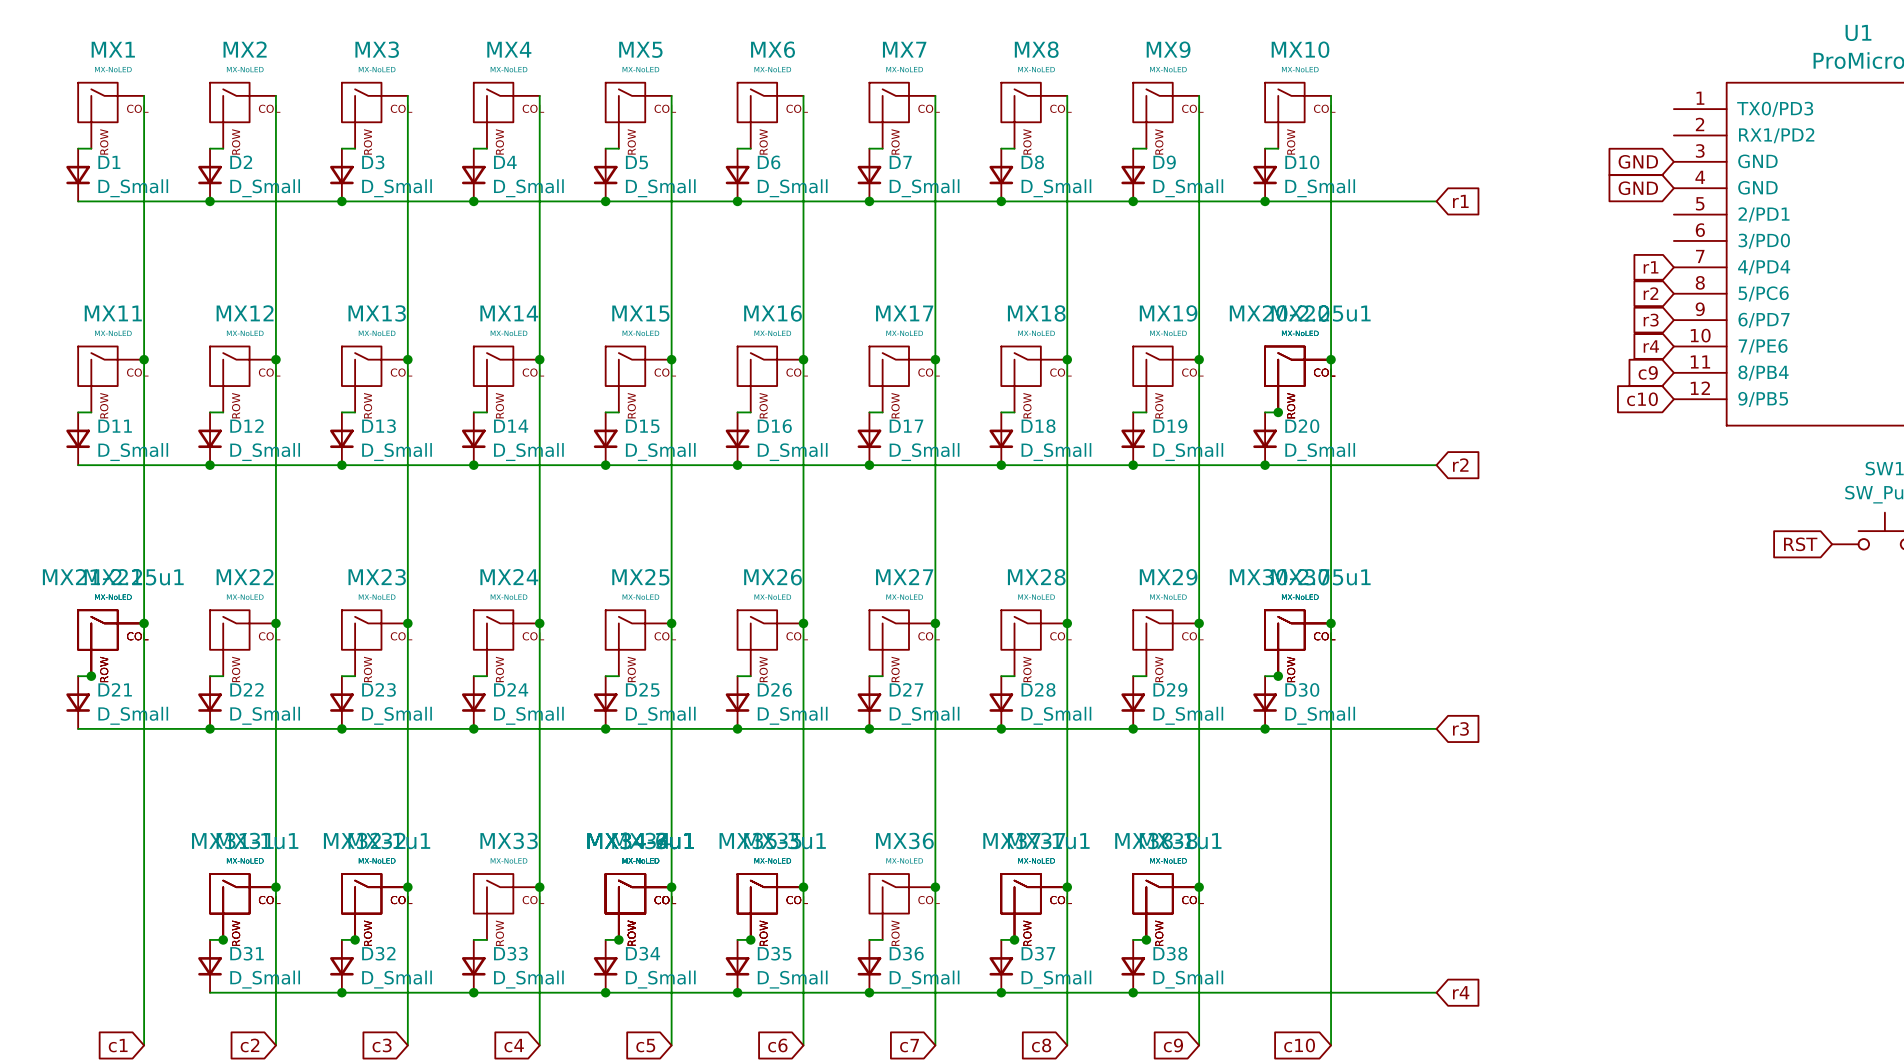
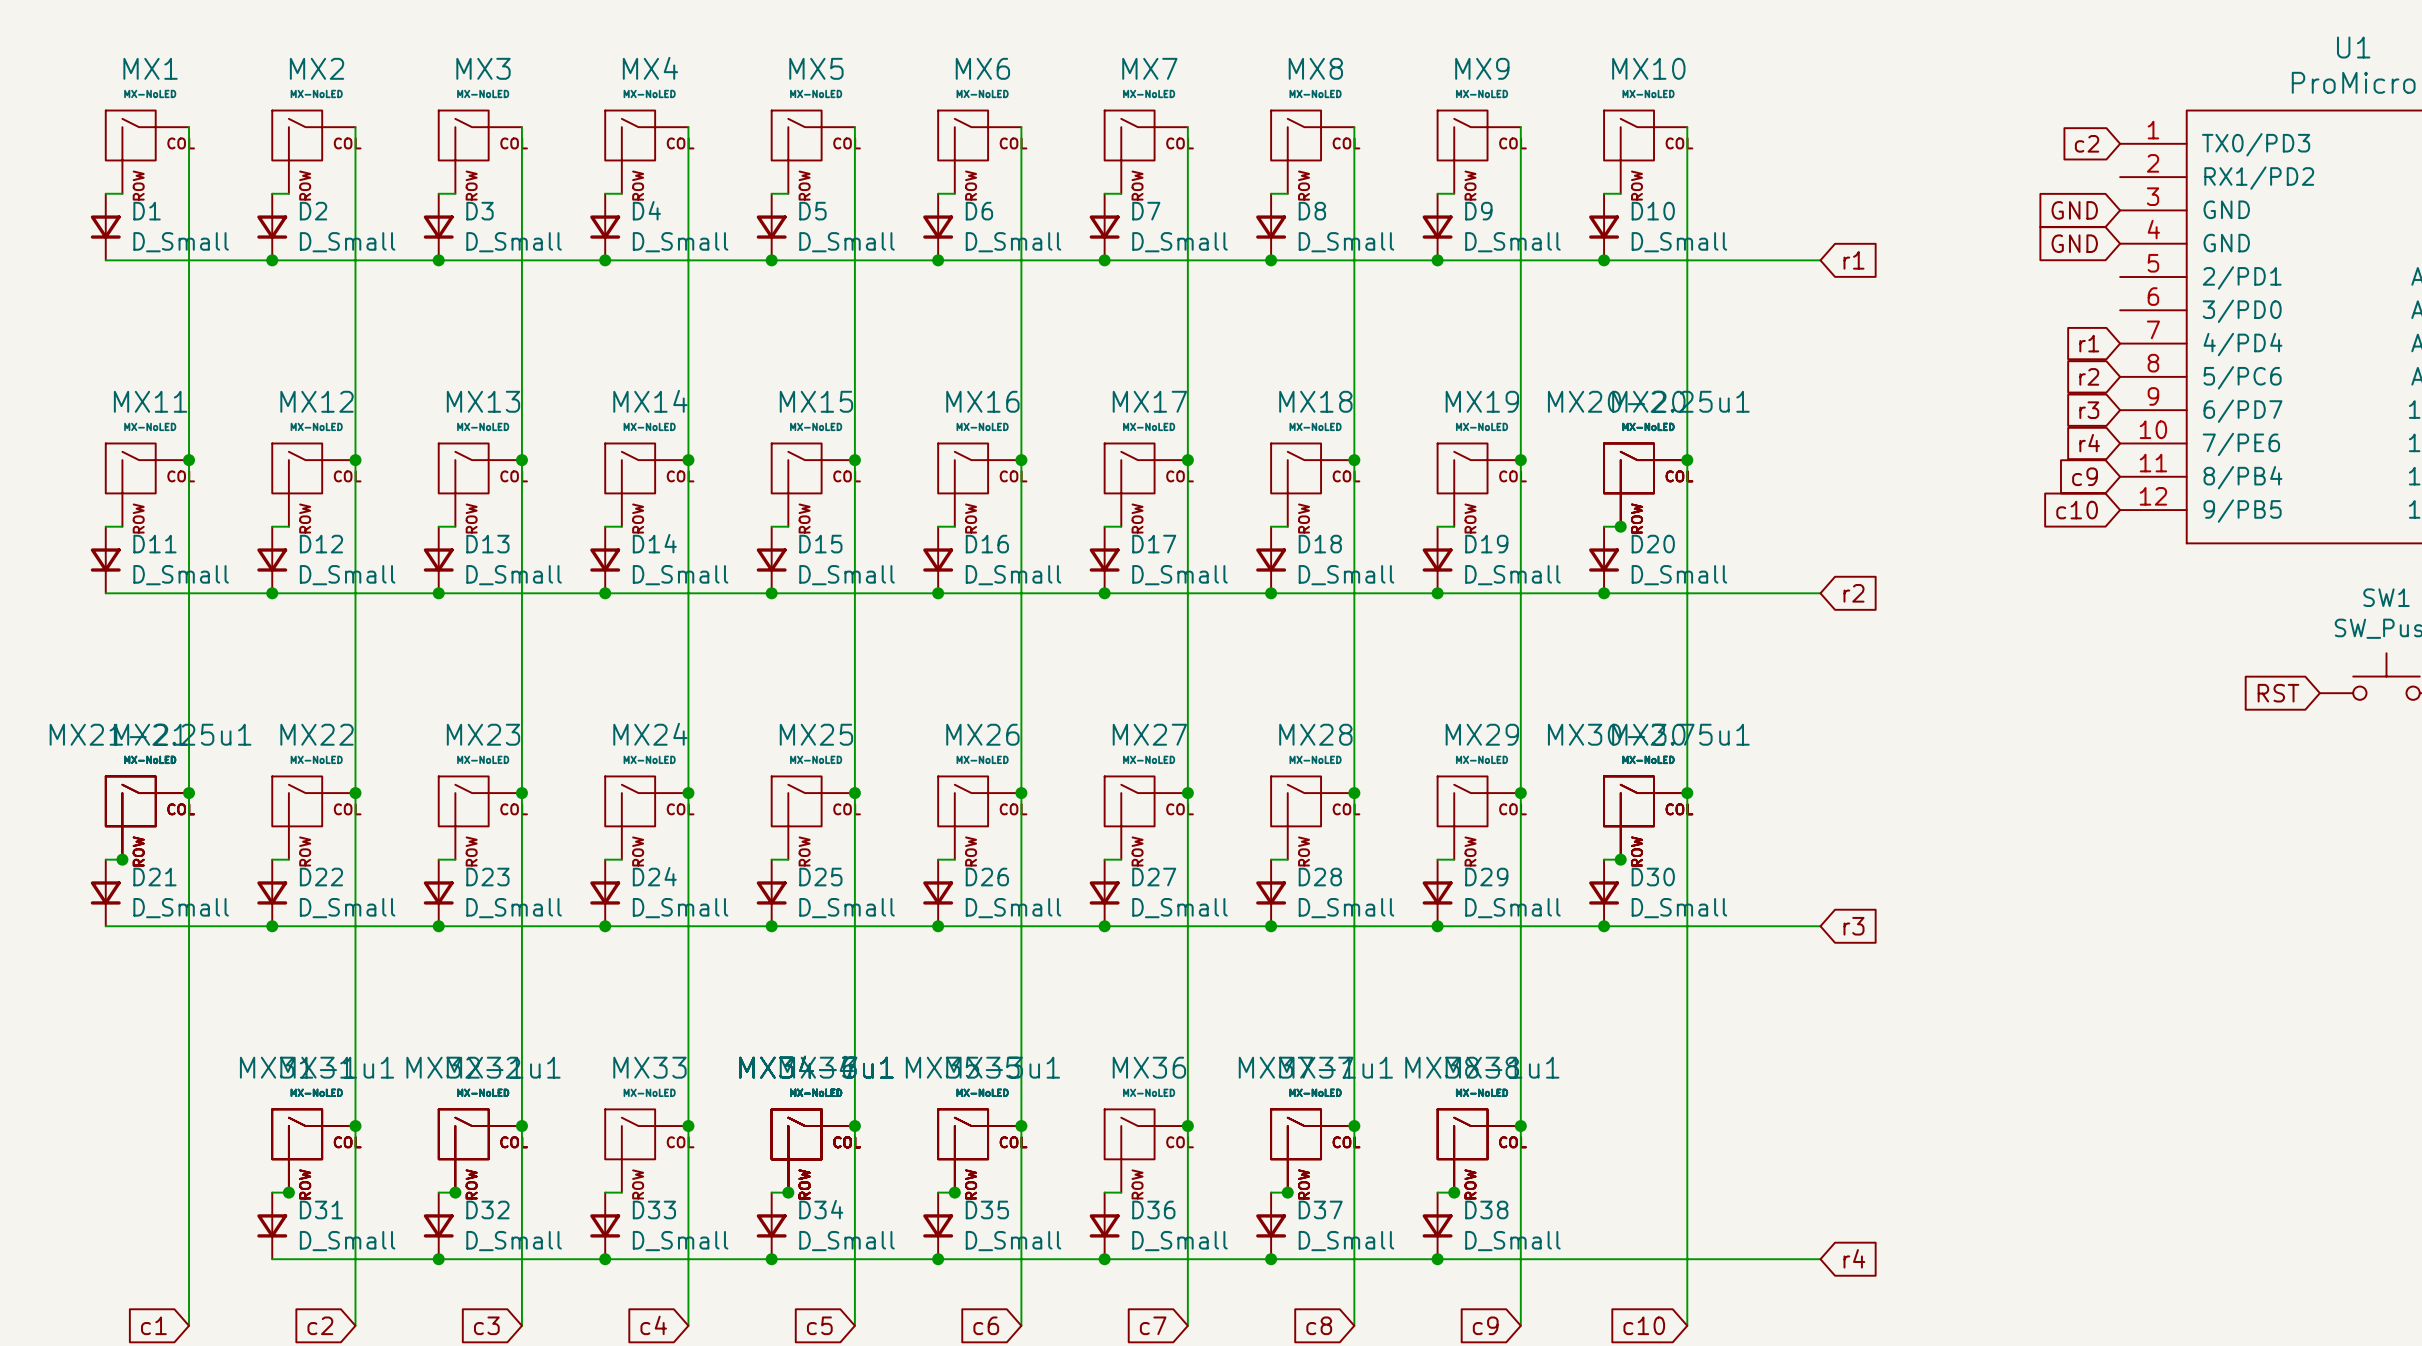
global label: none -> c2 (2087, 143)

